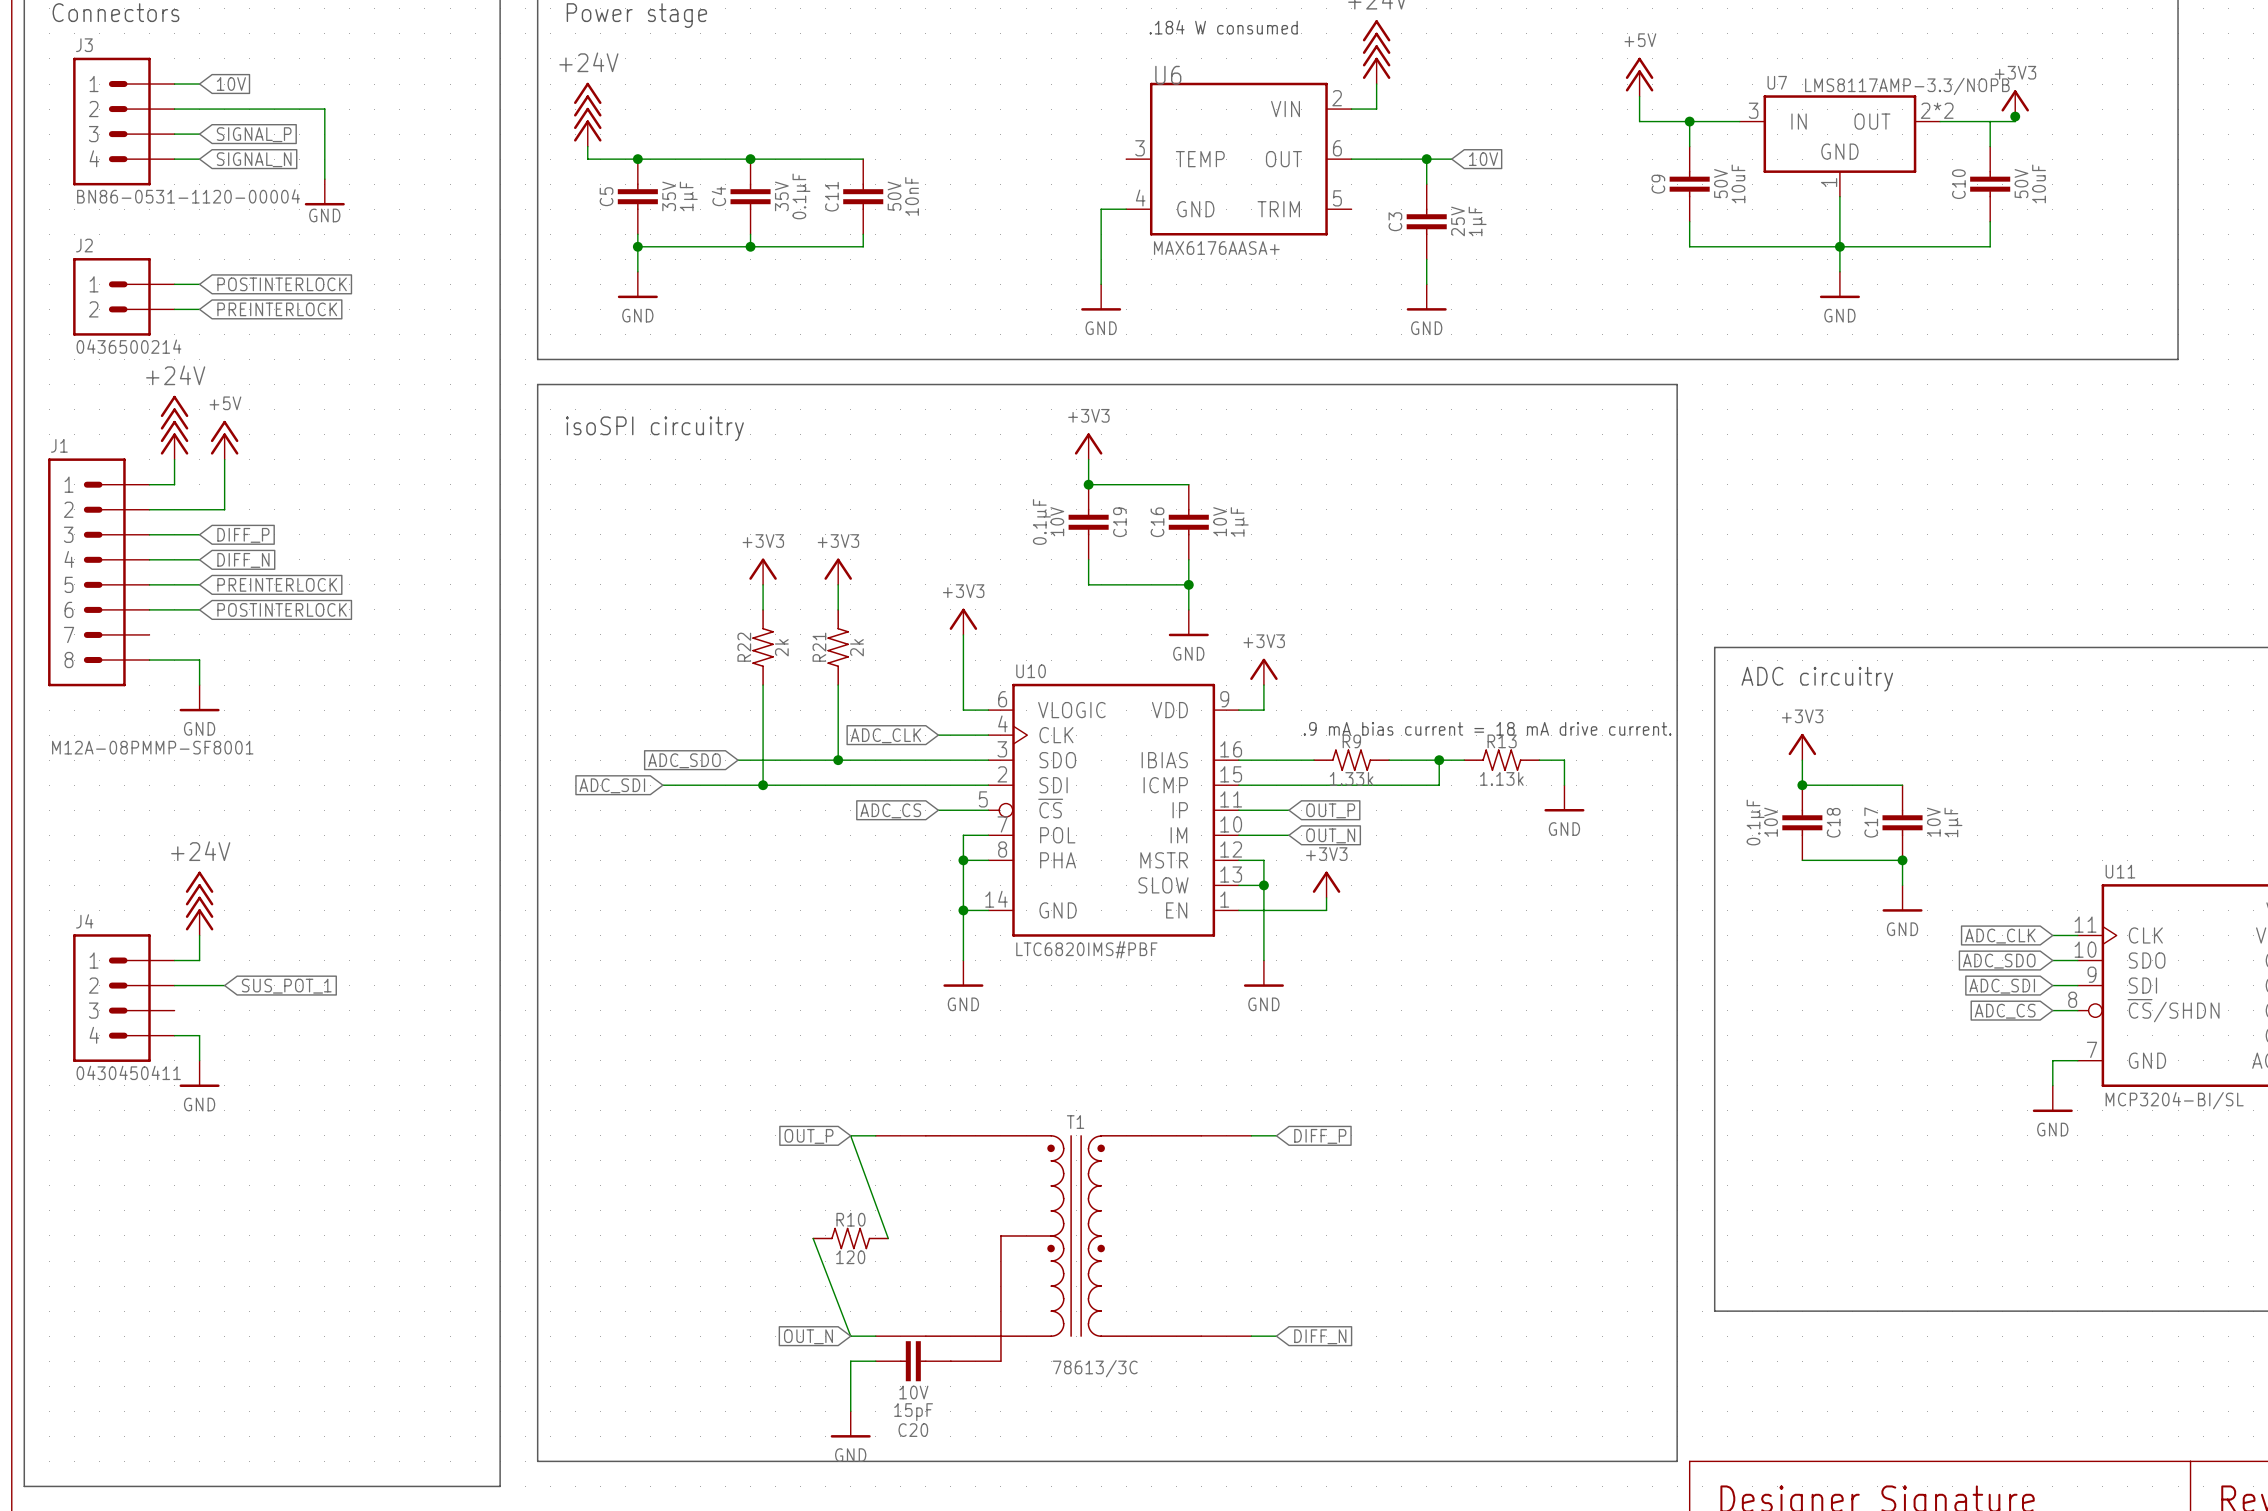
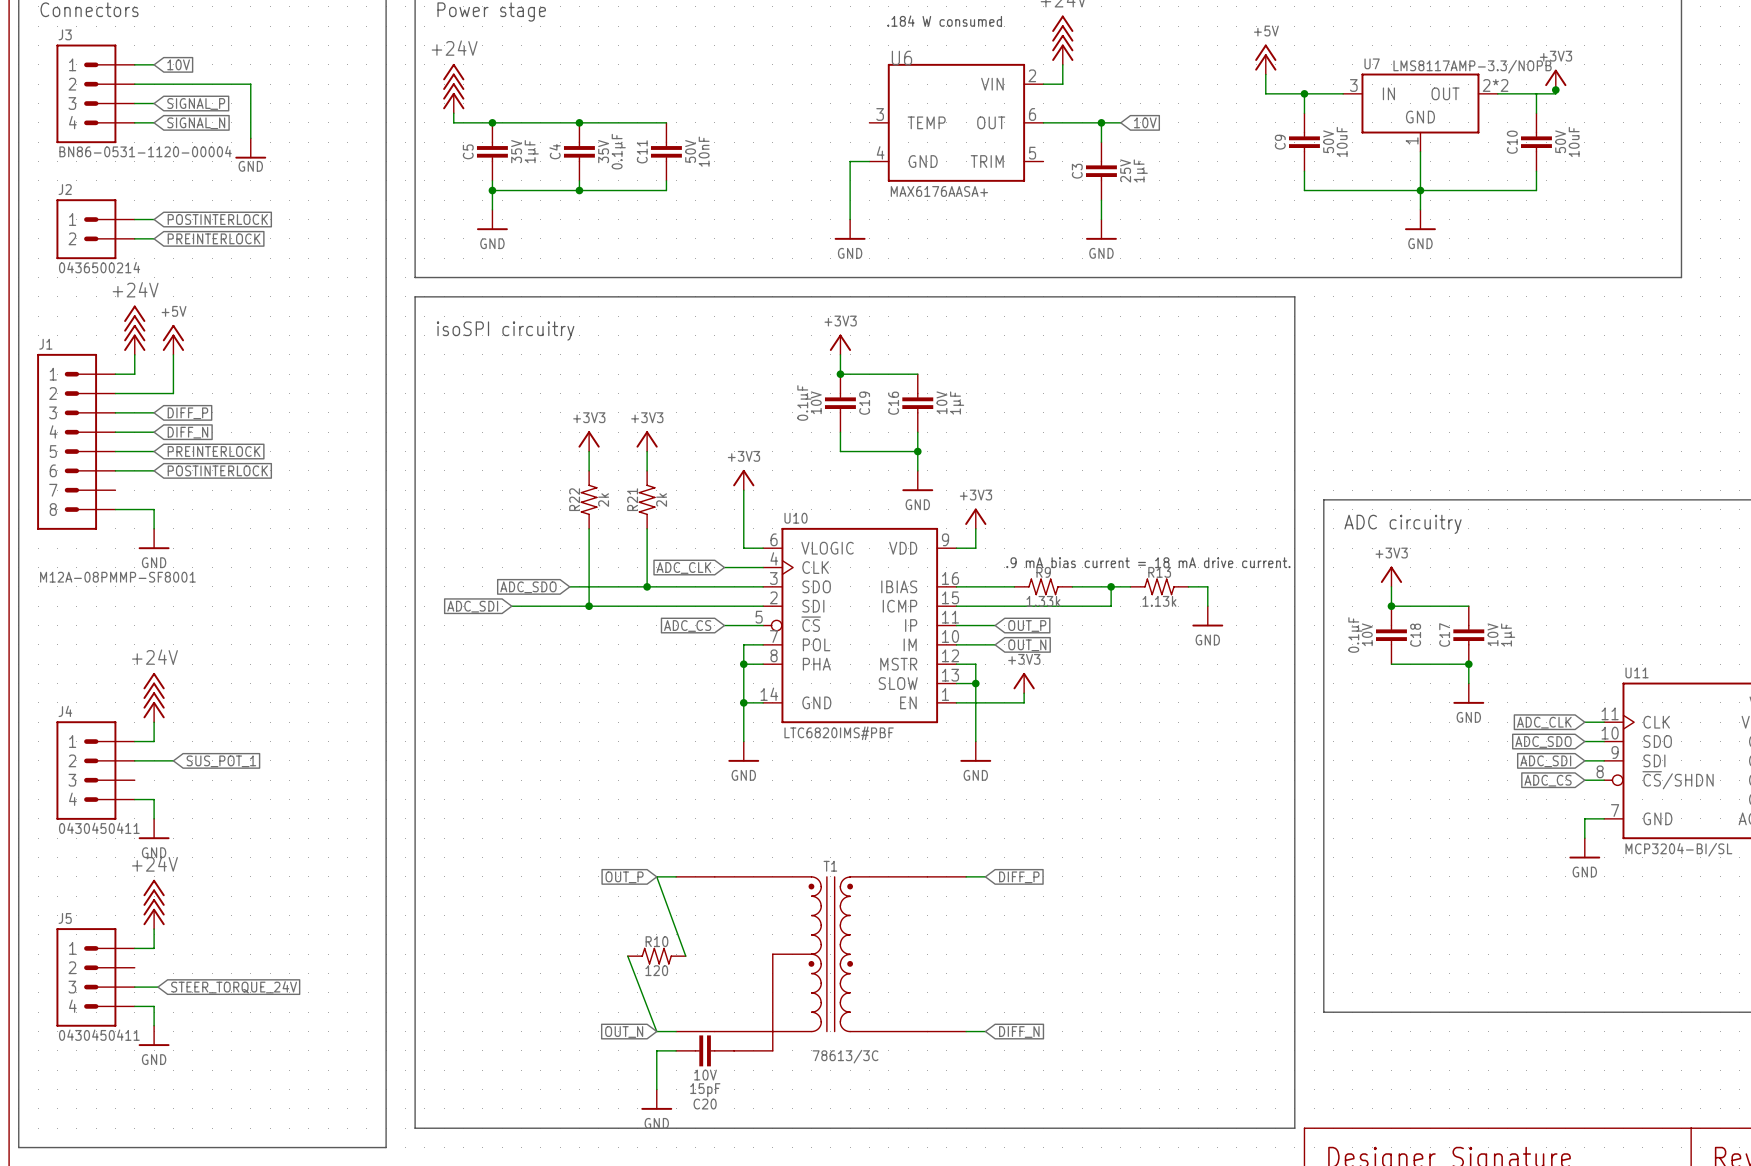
power symbol: none -> +24V (154, 904)
wire: none -> (154, 929) (154, 948) (134, 948)
J5: none -> (95, 977)
wire: none -> (134, 987) (157, 987)
global label: none -> STEER_TORQUE_24V (234, 987)
wire: none -> (134, 1006) (154, 1006) (154, 1025)
power symbol: none -> GND (154, 1035)

